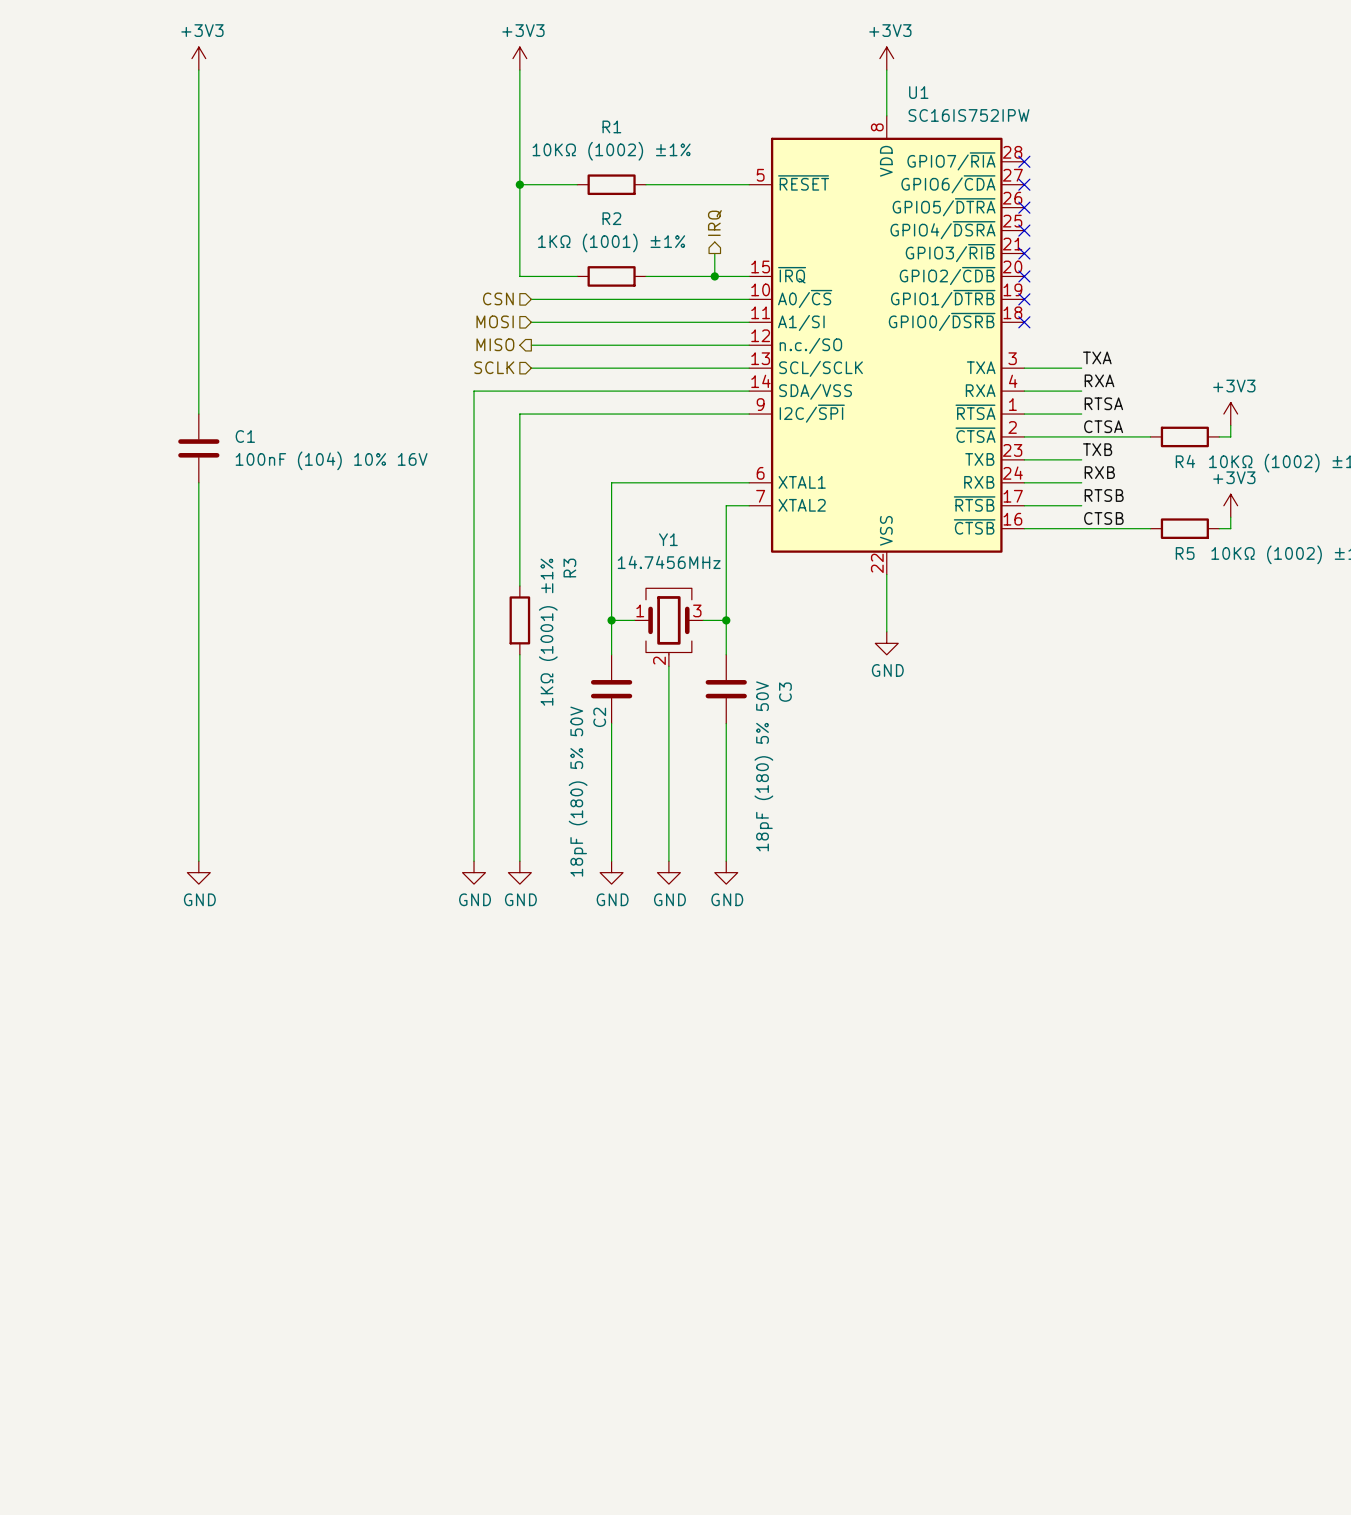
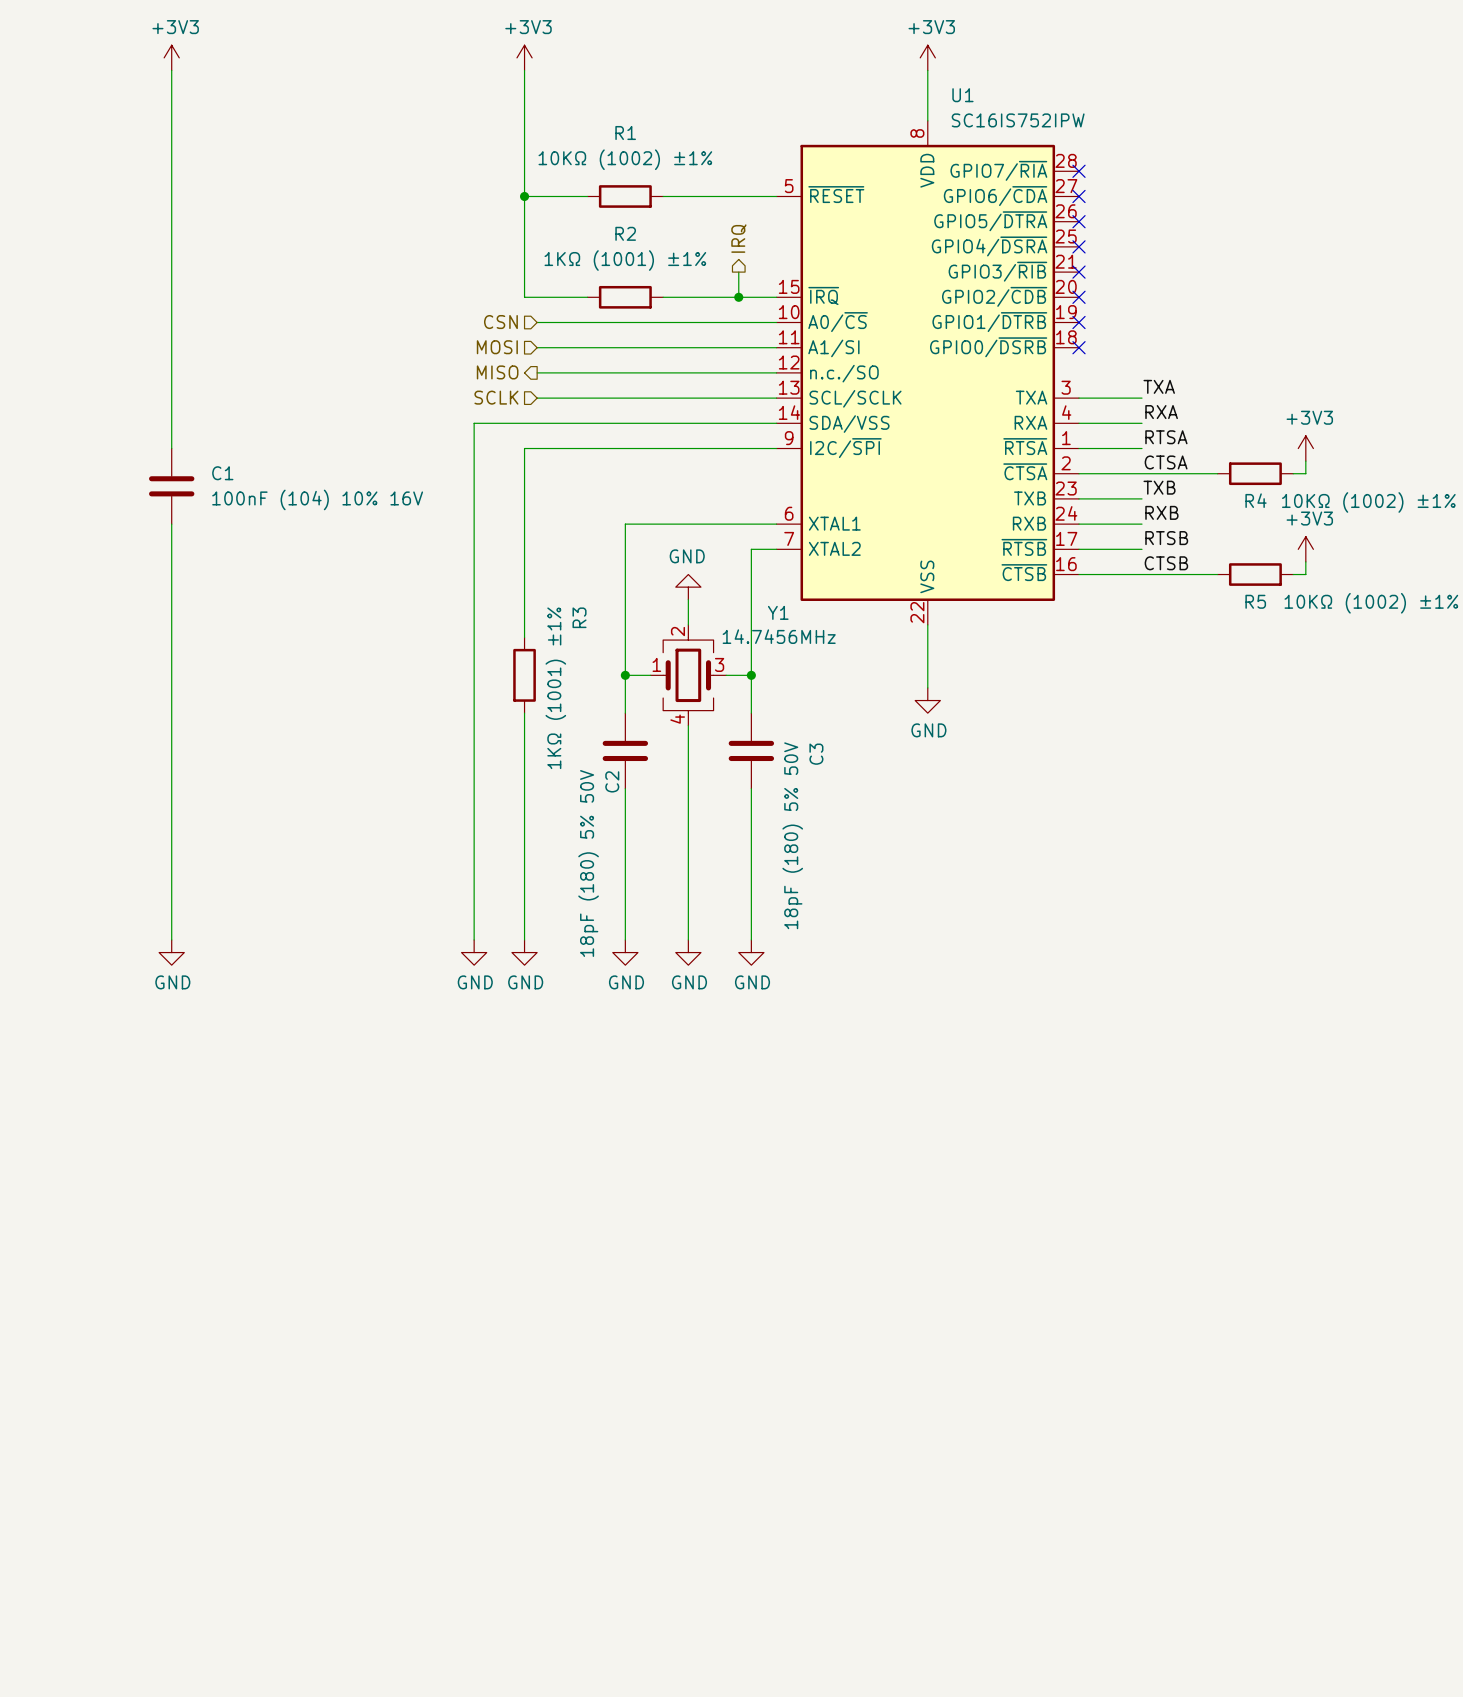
Y1 name position: Y1 (668, 539) -> Y1 (778, 612)
power symbol: none -> GND (688, 587)
wire: none -> (688, 599) (688, 624)
Y1 value position: 14.7456MHz (669, 562) -> 14.7456MHz (779, 636)
Y1 symbol: [634, 588, 704, 667] -> [650, 624, 727, 726]

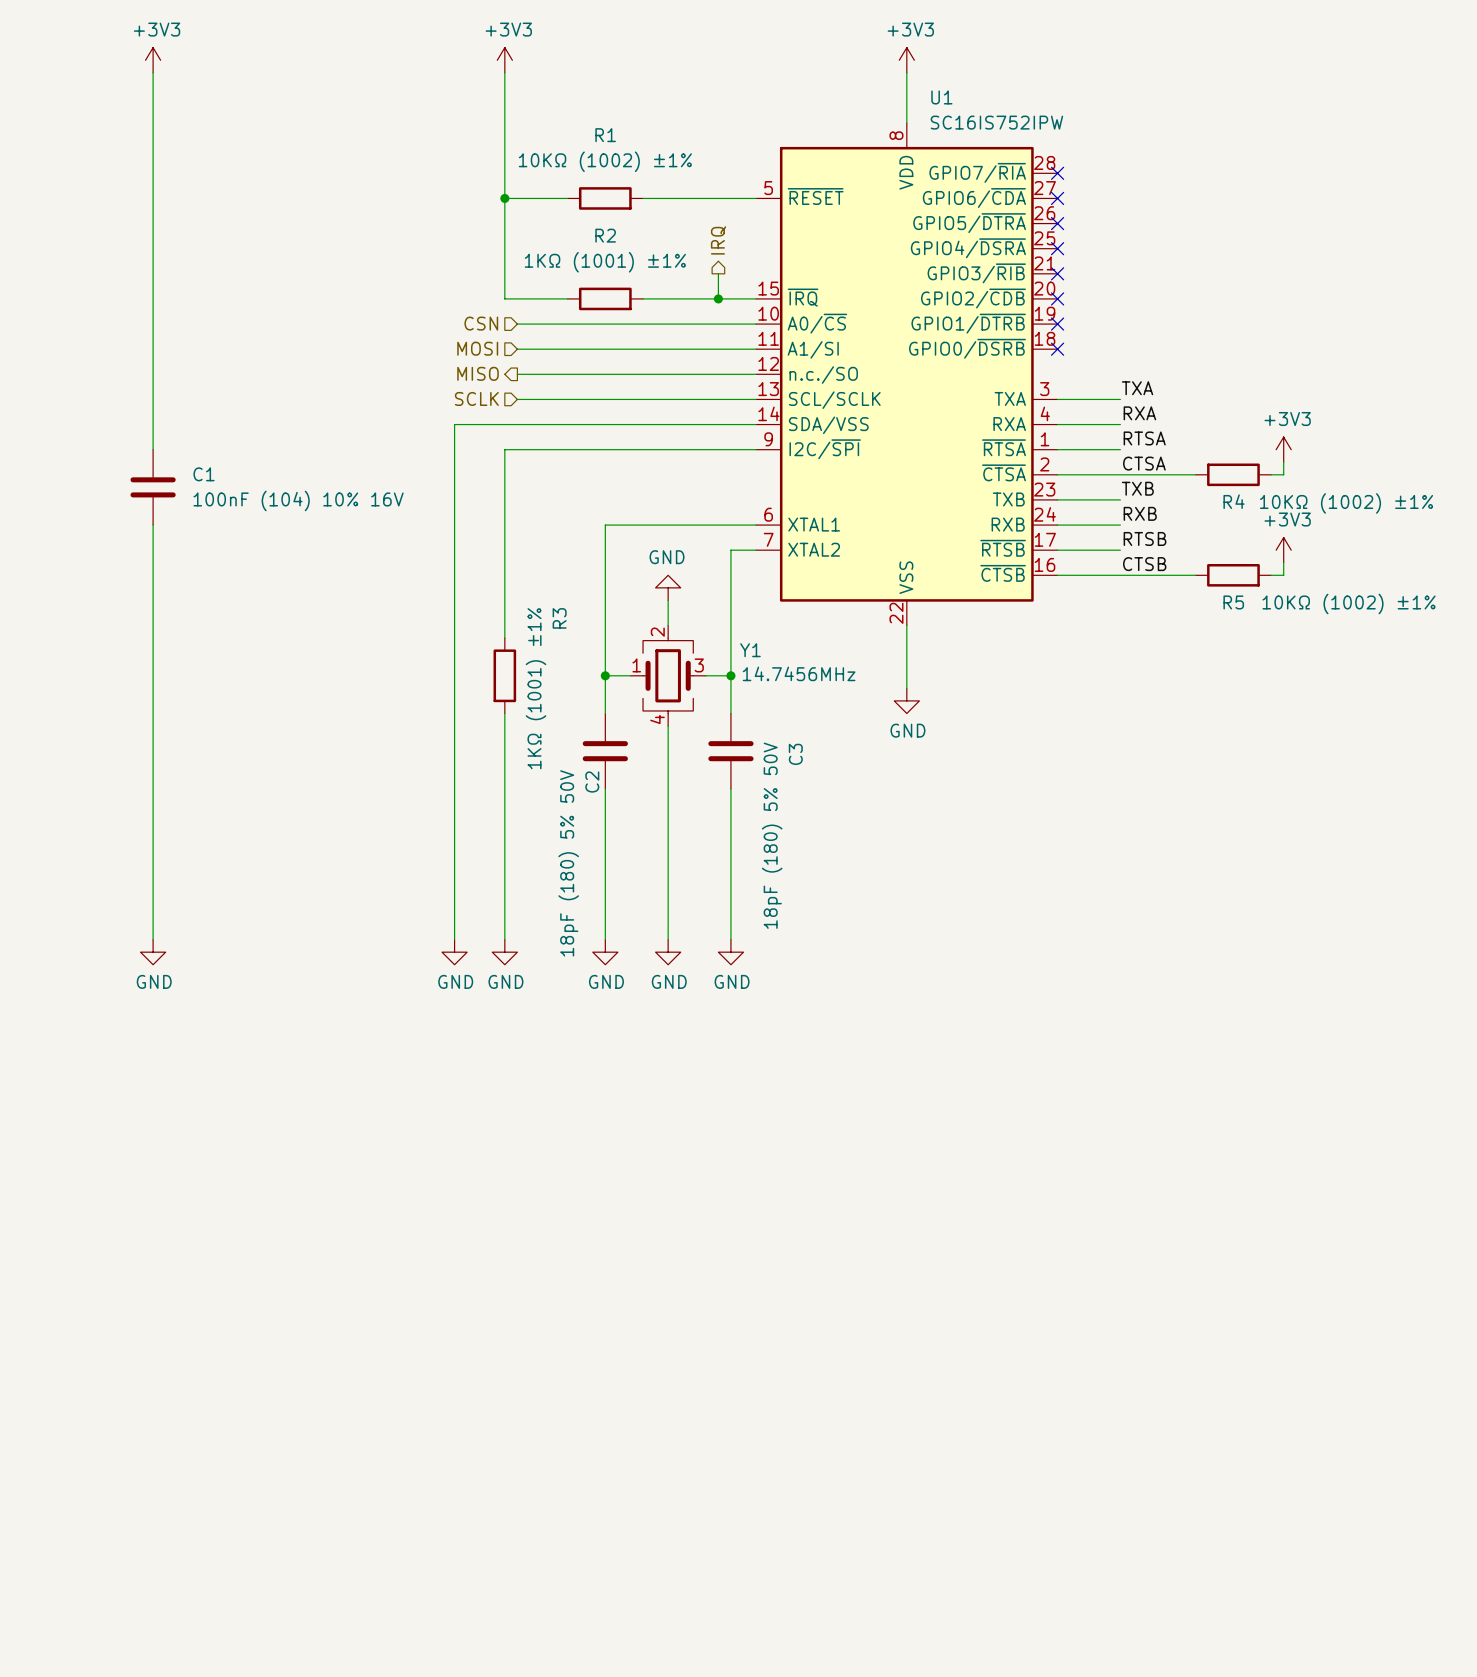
Y1 name position: Y1 (778, 612) -> Y1 (750, 650)
Y1 value position: 14.7456MHz (779, 636) -> 14.7456MHz (799, 673)

